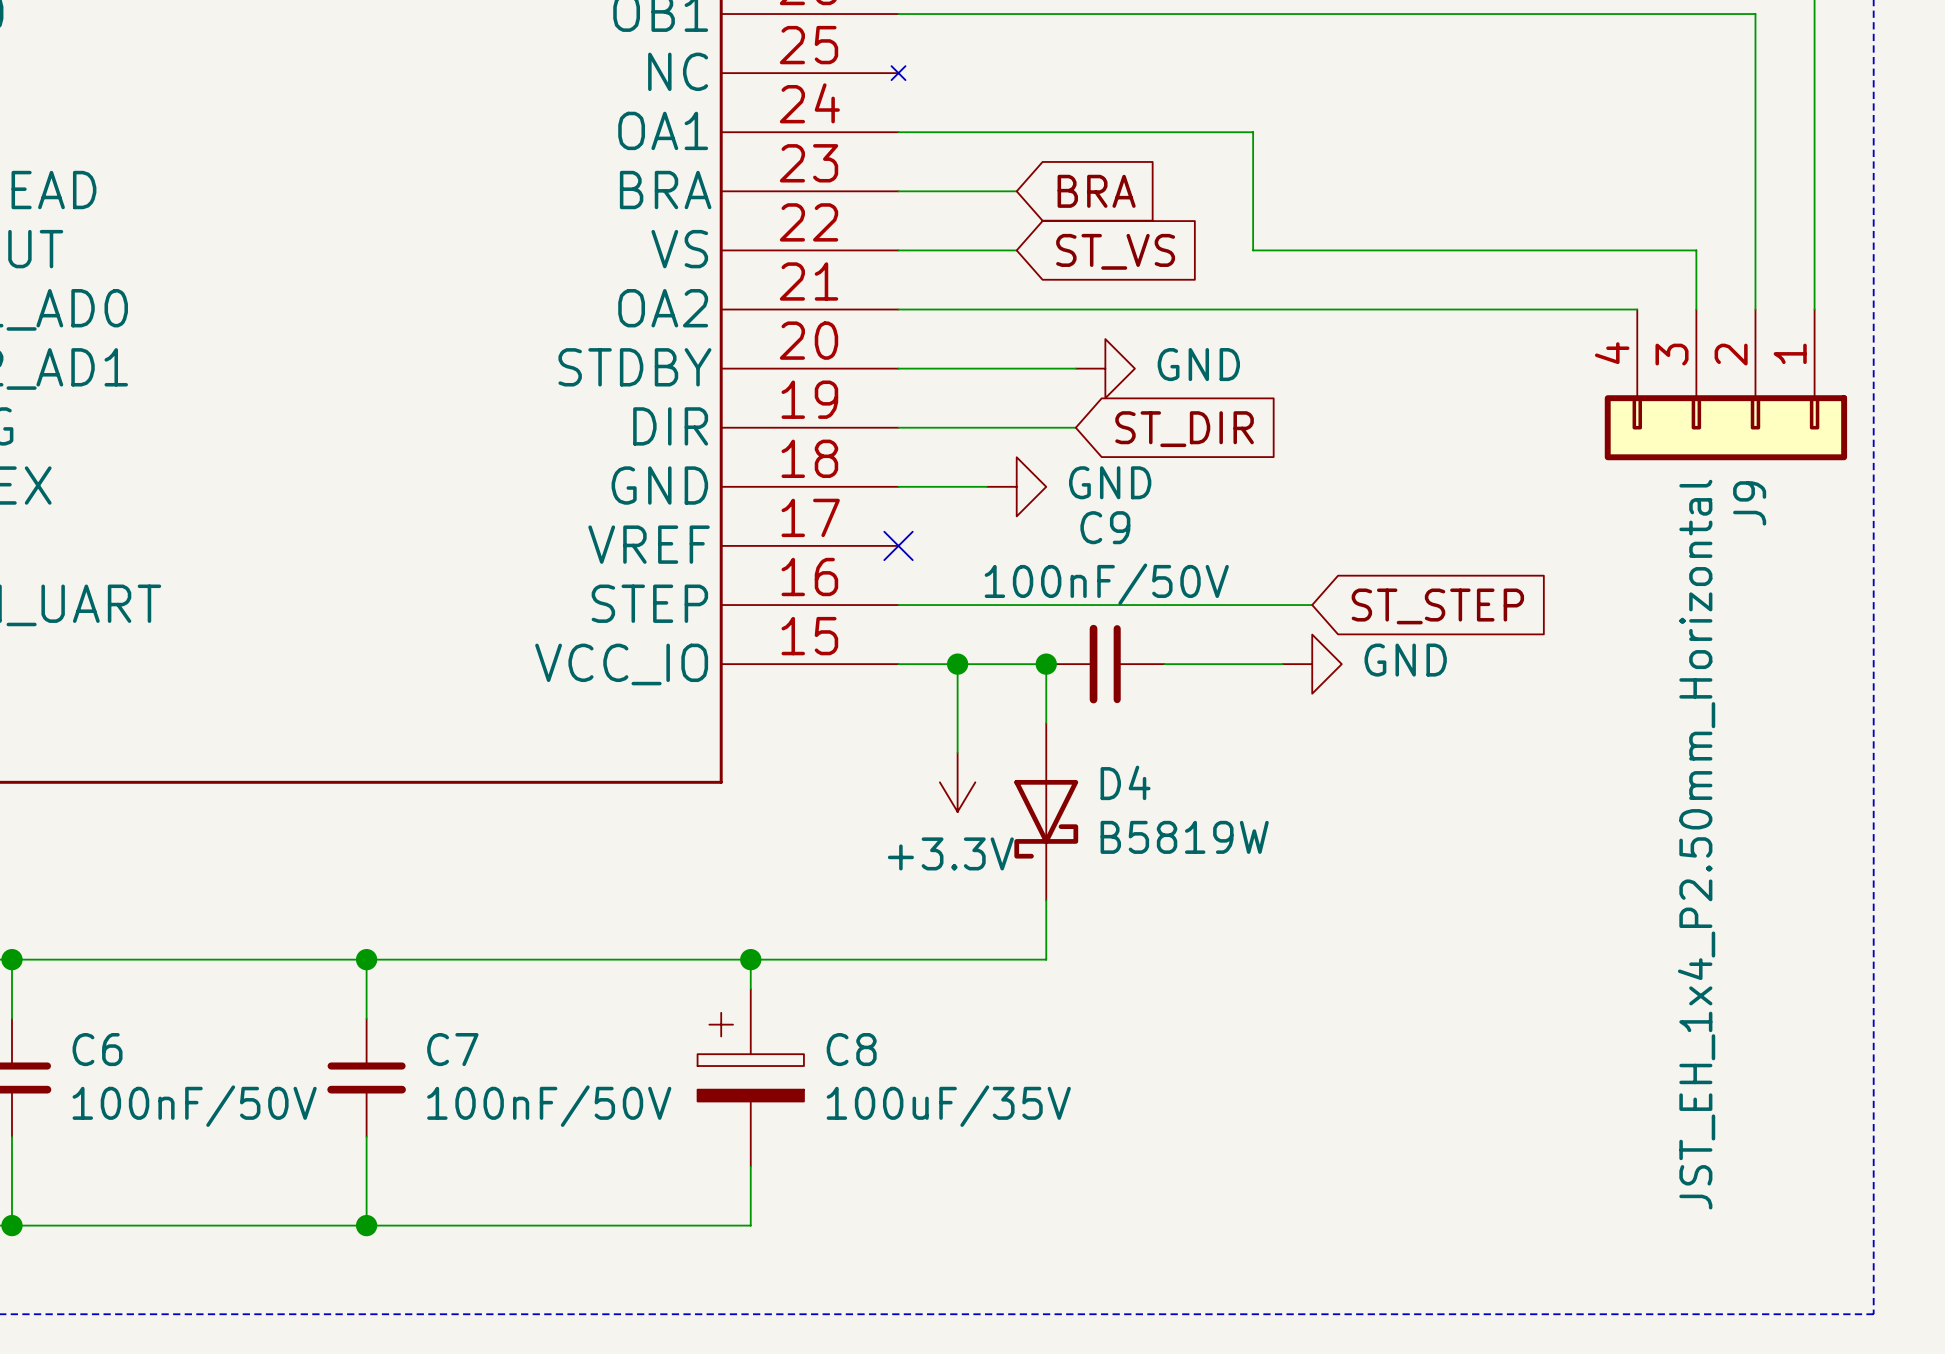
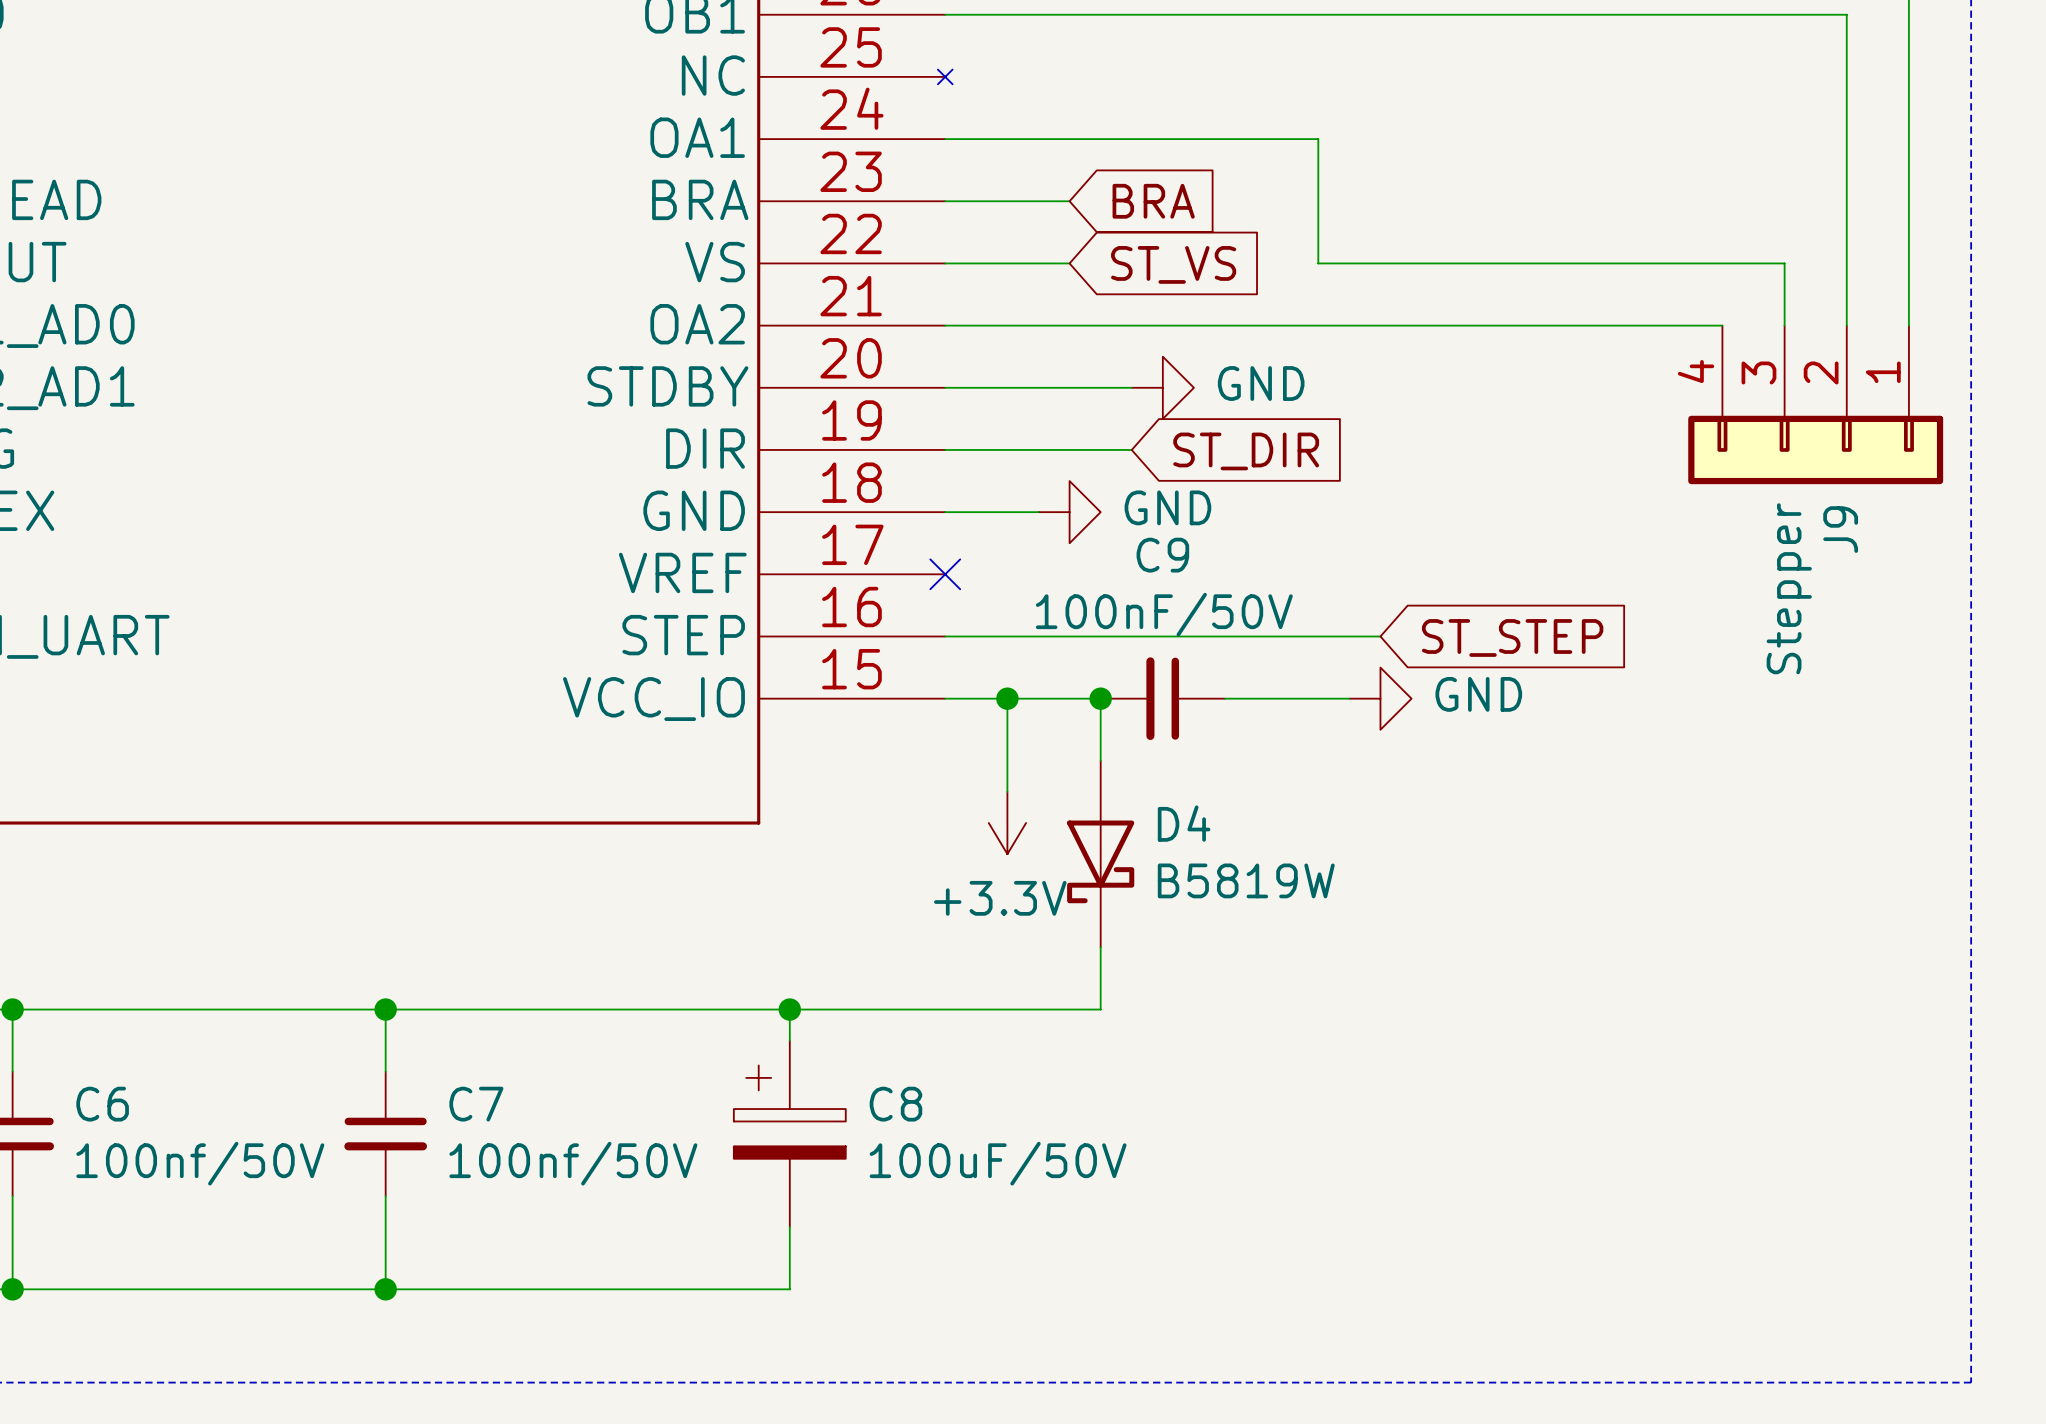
J9 value: JST_EH_1x4_P2.50mm_Horizontal (1696, 844) -> Stepper (1789, 588)
C6 value: 100nF/50V (194, 1106) -> 100nf/50V (200, 1163)
C7 value: 100nF/50V (549, 1106) -> 100nf/50V (573, 1163)
C8 value: 100uF/35V (948, 1106) -> 100uF/50V (998, 1163)

